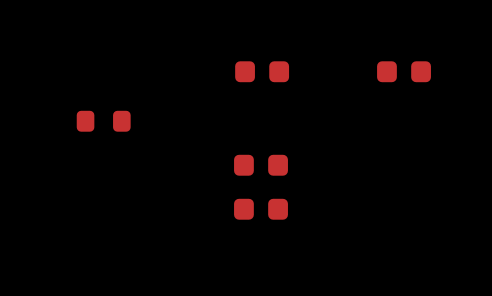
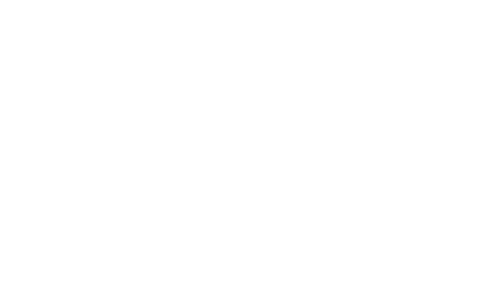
part: (262, 71) -> none
part: (404, 71) -> none
part: (103, 121) -> none
part: (261, 165) -> none
part: (261, 209) -> none

